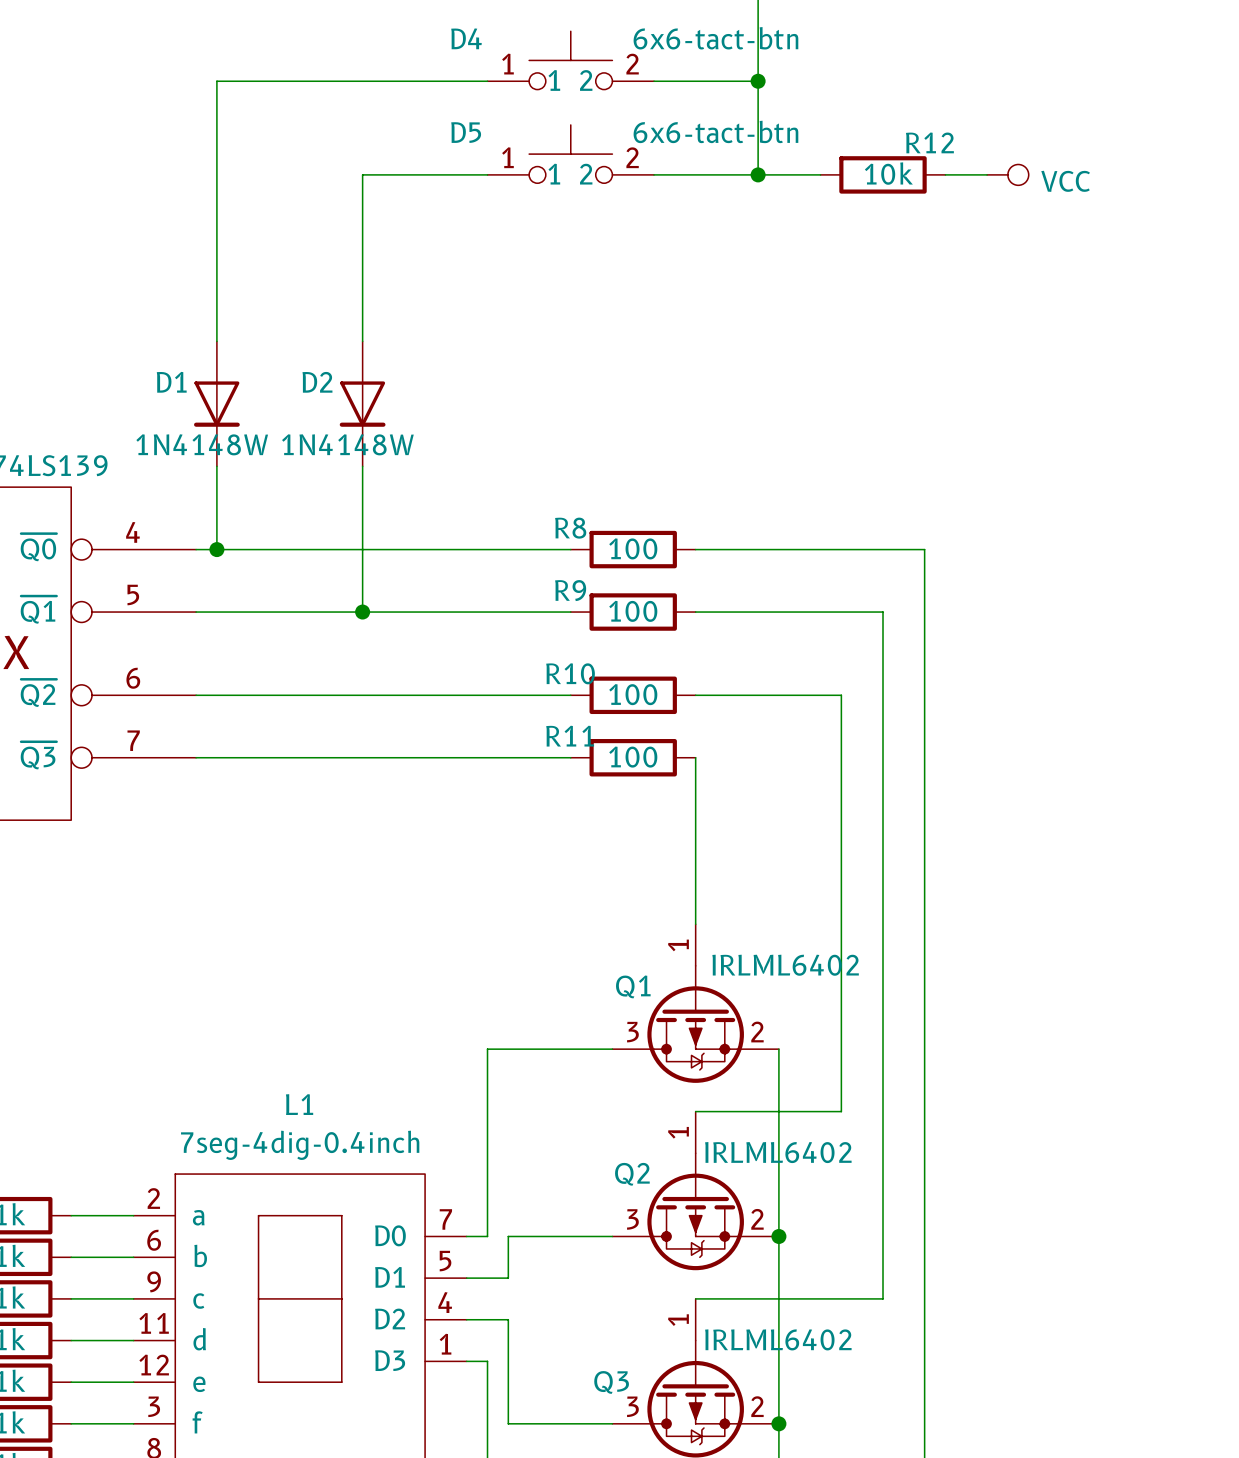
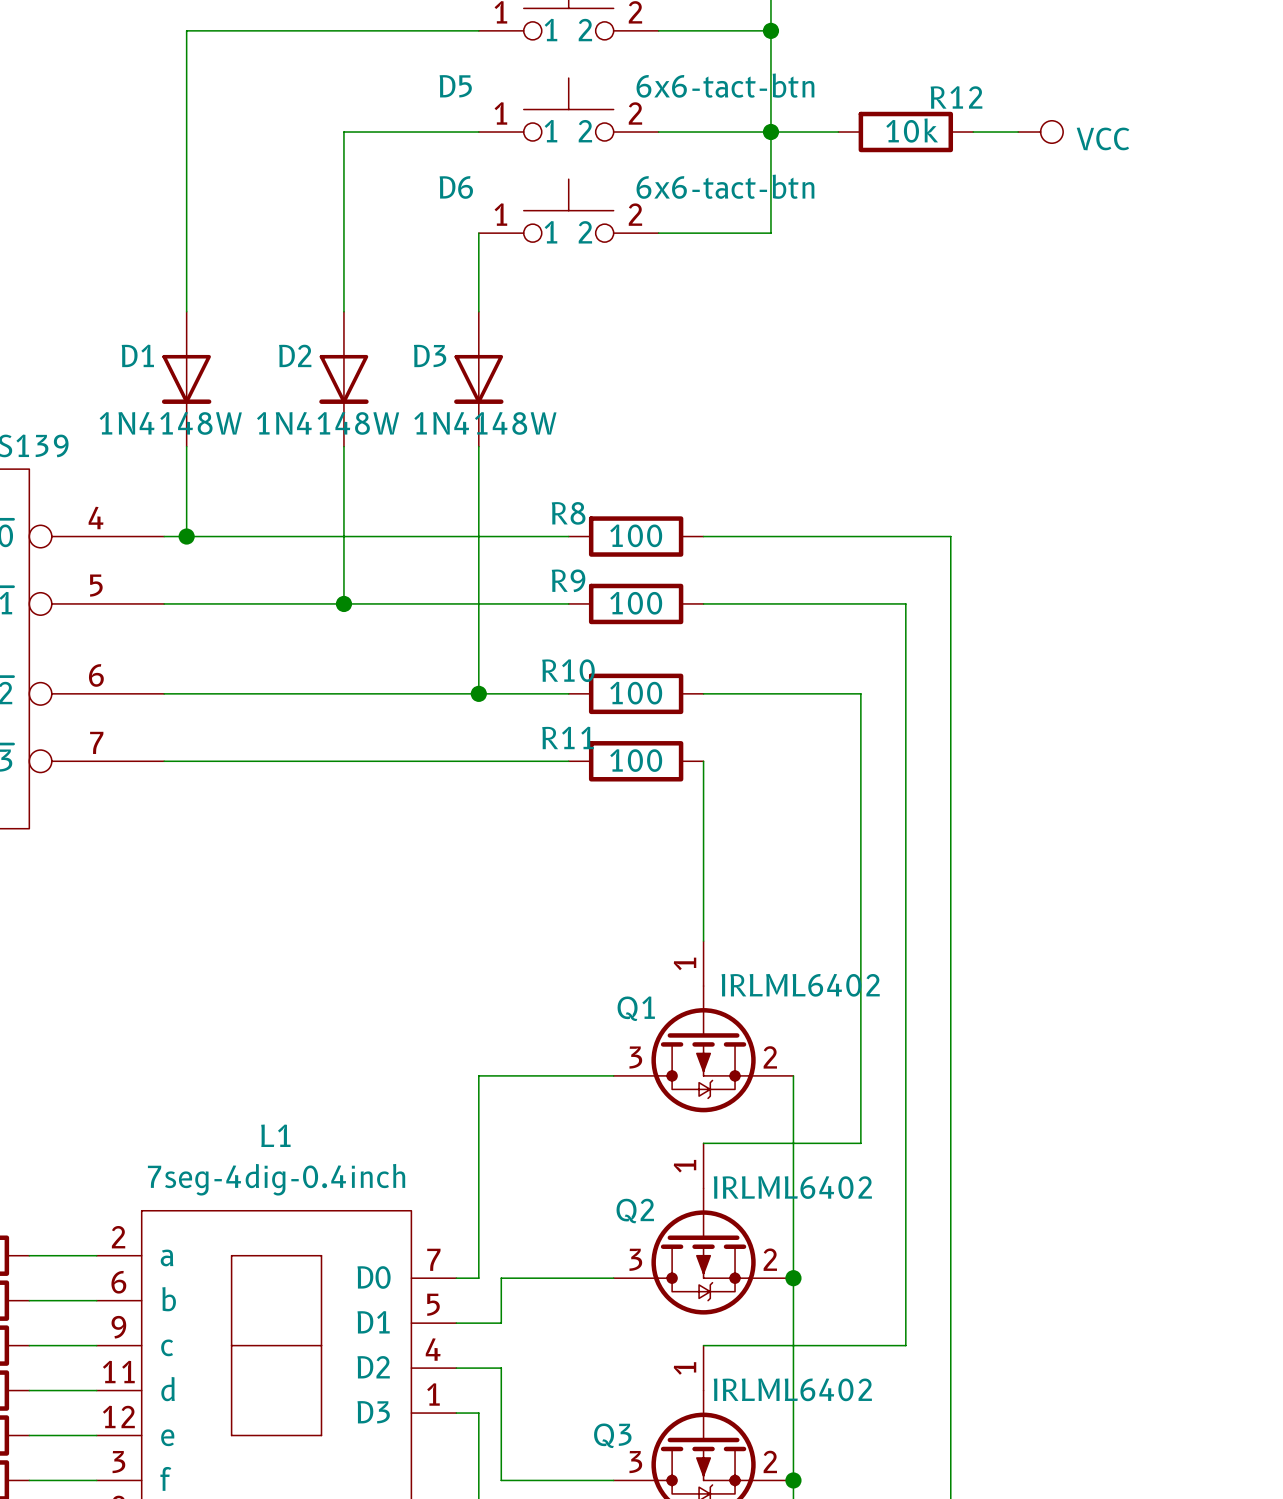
wire: none -> (770, 132) (770, 233) (658, 233)
D6: none -> 6x6-tact-btn (568, 210)
wire: none -> (478, 233) (478, 311)
D3: none -> 1N4148W (478, 379)
wire: none -> (478, 446) (478, 693)
junction: none -> (478, 693)

